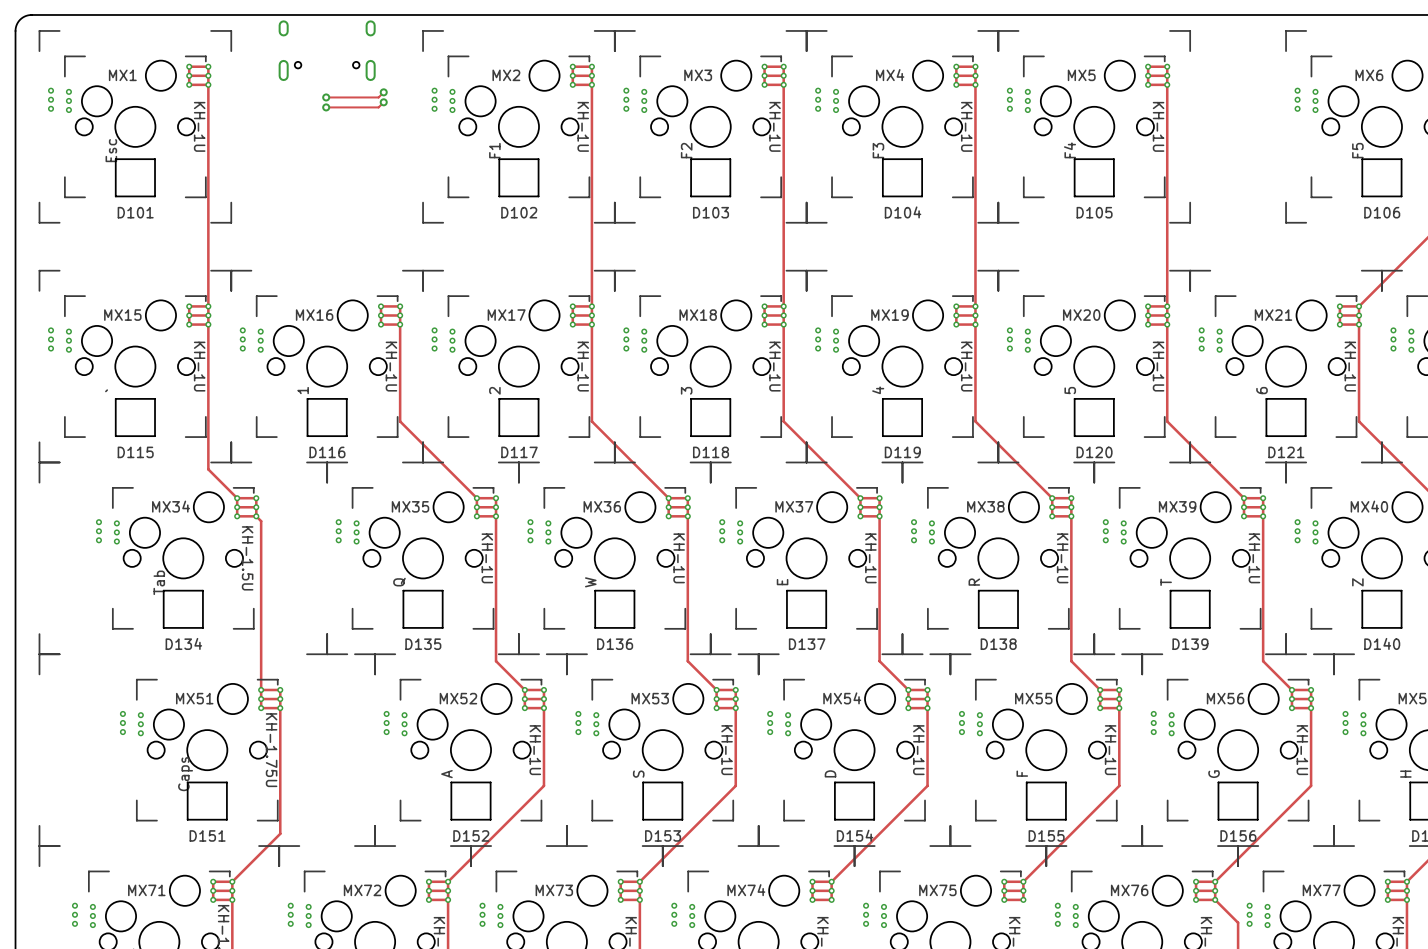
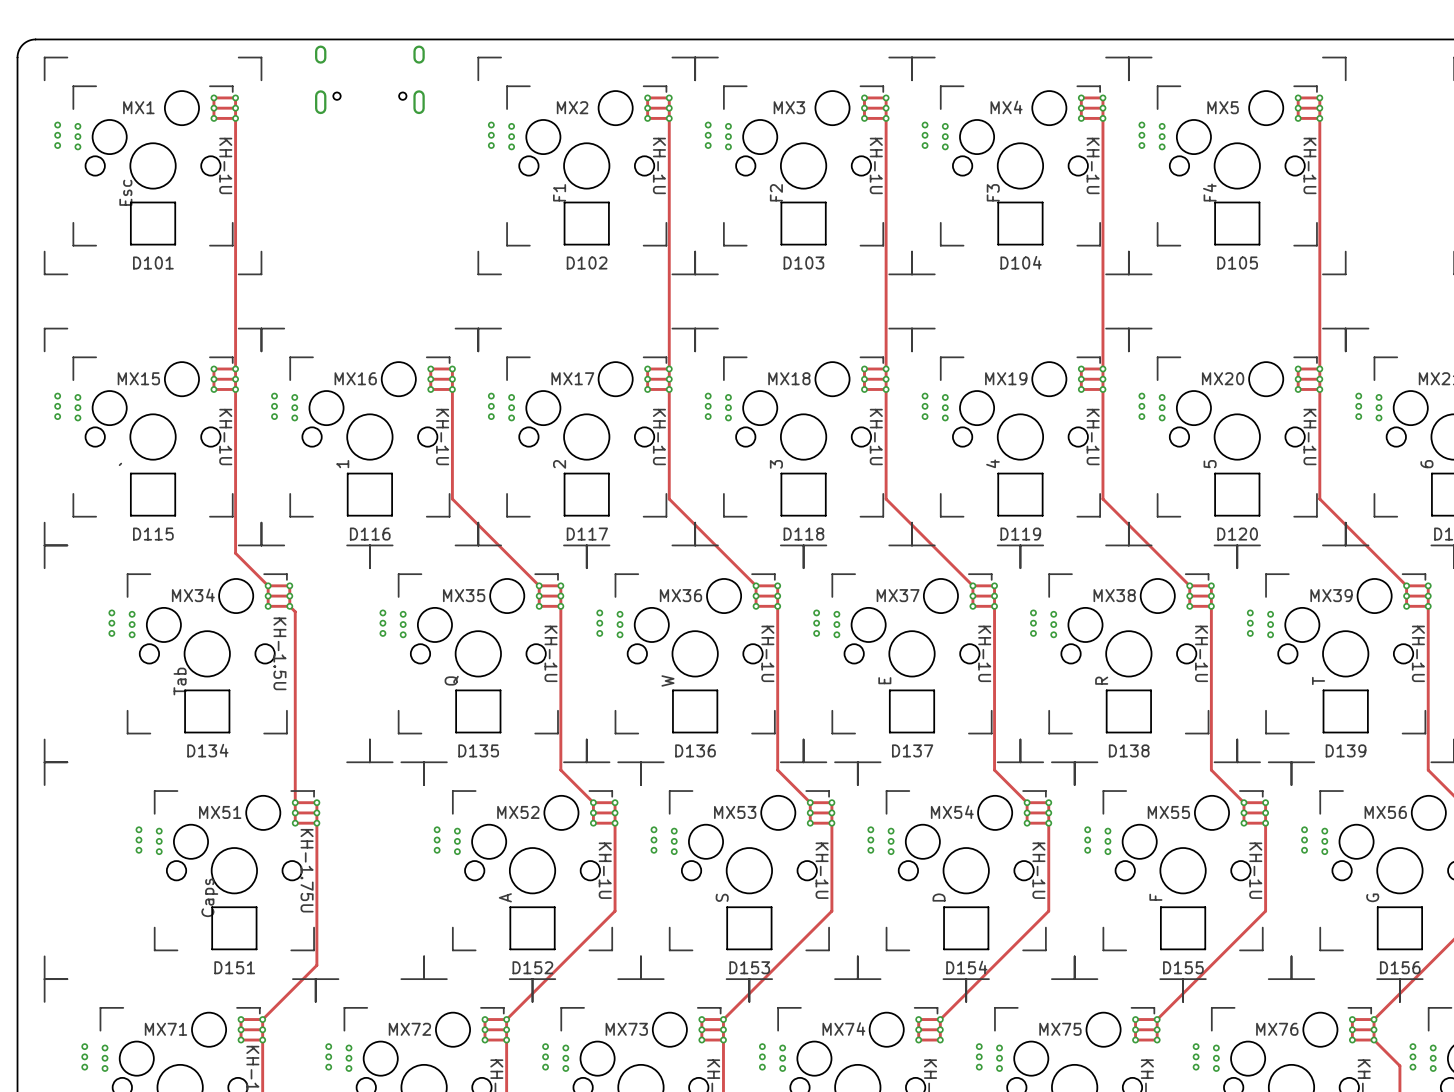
track: (383, 92) (378, 97) (326, 97) -> none
via: (383, 92) -> none
via: (326, 97) -> none
track: (383, 102) (378, 107) (326, 107) -> none
via: (383, 102) -> none
via: (326, 107) -> none

